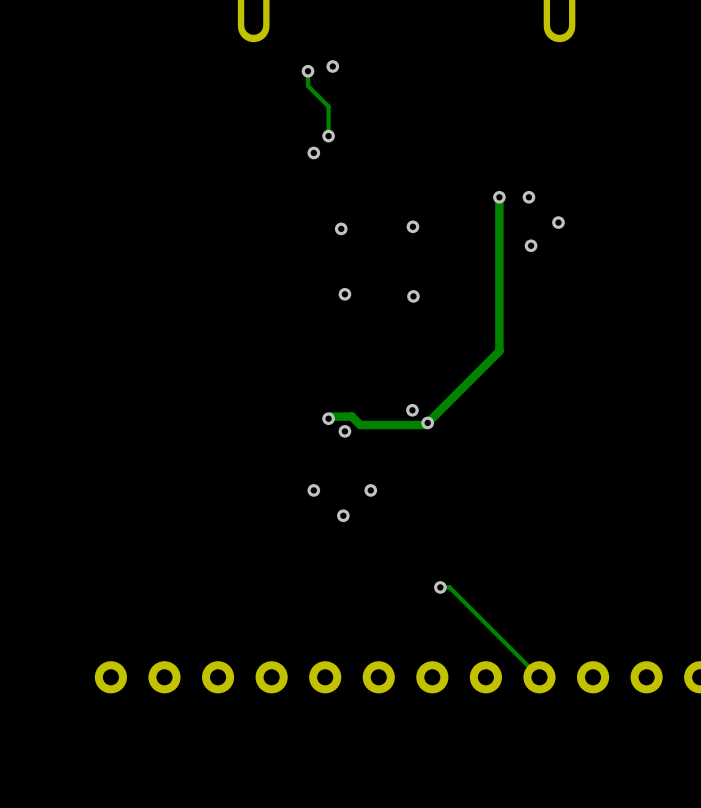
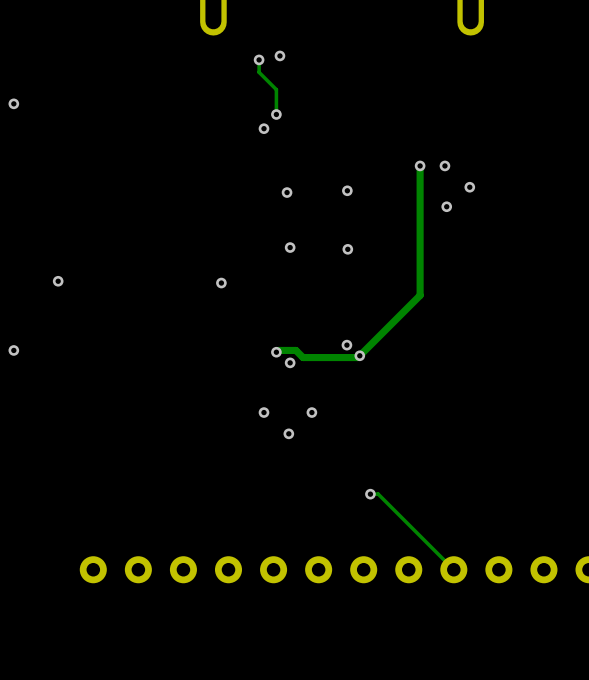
via: none -> (13, 103)
via: none -> (58, 281)
via: none -> (221, 283)
via: none -> (13, 350)

